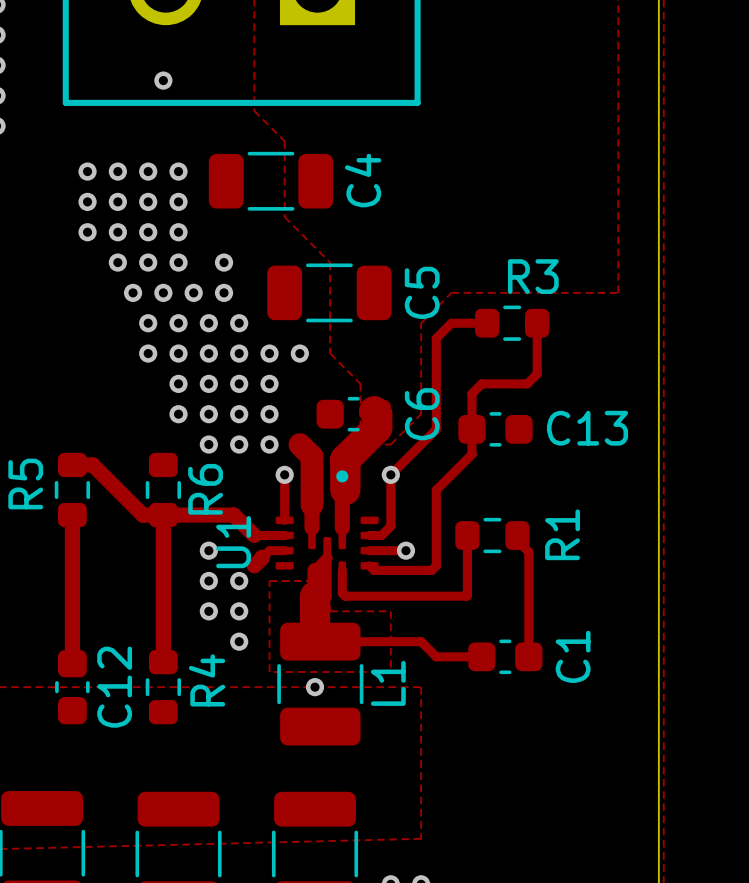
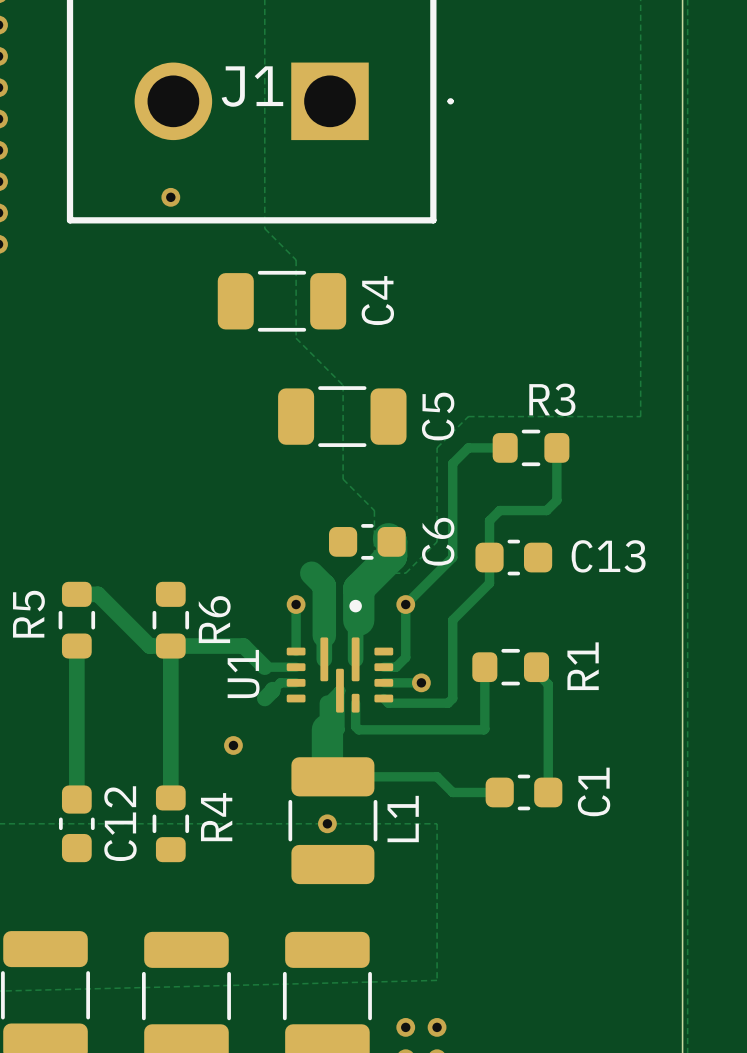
via: (87, 171) -> none
via: (117, 171) -> none
via: (148, 171) -> none
via: (178, 171) -> none
via: (87, 201) -> none
via: (117, 201) -> none
via: (148, 201) -> none
via: (178, 201) -> none
via: (87, 232) -> none
via: (117, 232) -> none
via: (148, 232) -> none
via: (178, 232) -> none
via: (117, 262) -> none
via: (148, 262) -> none
via: (178, 262) -> none
via: (224, 262) -> none
via: (133, 292) -> none
via: (163, 292) -> none
via: (193, 292) -> none
via: (224, 292) -> none
via: (148, 323) -> none
via: (178, 323) -> none
via: (208, 323) -> none
via: (239, 323) -> none
via: (148, 353) -> none
via: (178, 353) -> none
via: (208, 353) -> none
via: (239, 353) -> none
via: (269, 353) -> none
via: (299, 353) -> none
via: (178, 383) -> none
via: (208, 383) -> none
via: (239, 383) -> none
via: (269, 383) -> none
via: (178, 414) -> none
via: (208, 414) -> none
via: (239, 414) -> none
via: (269, 414) -> none
via: (208, 444) -> none
via: (239, 444) -> none
via: (269, 444) -> none
via: (208, 550) -> none
via: (208, 581) -> none
via: (239, 581) -> none
zone outline: (269, 581) (269, 671) (390, 671) (390, 611) (330, 611) (330, 581) (269, 581) -> none
via: (208, 611) -> none
via: none -> (233, 745)
via: (239, 611) -> none
via: (239, 641) -> none

